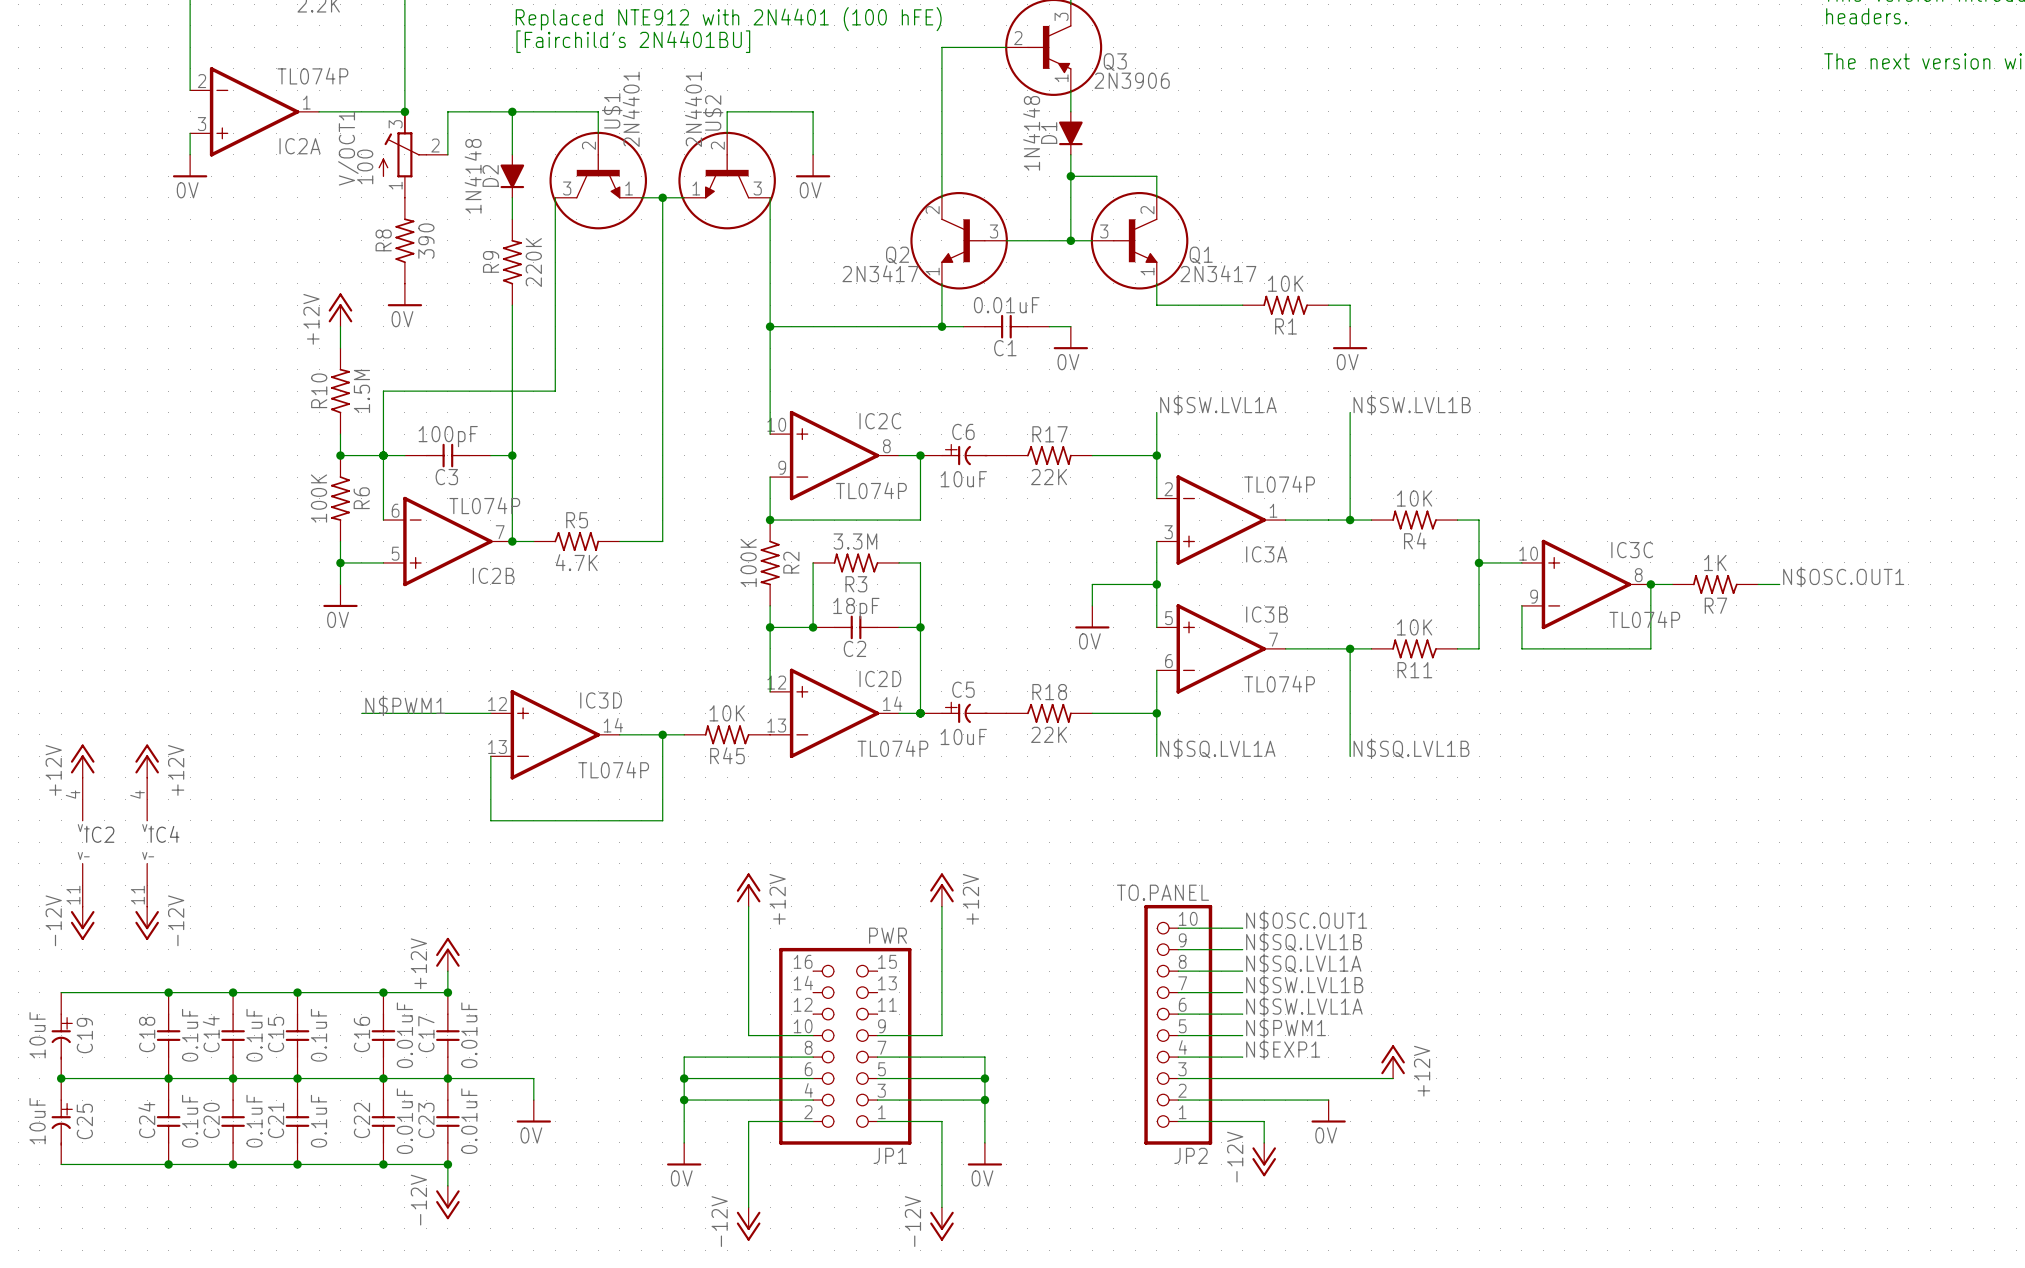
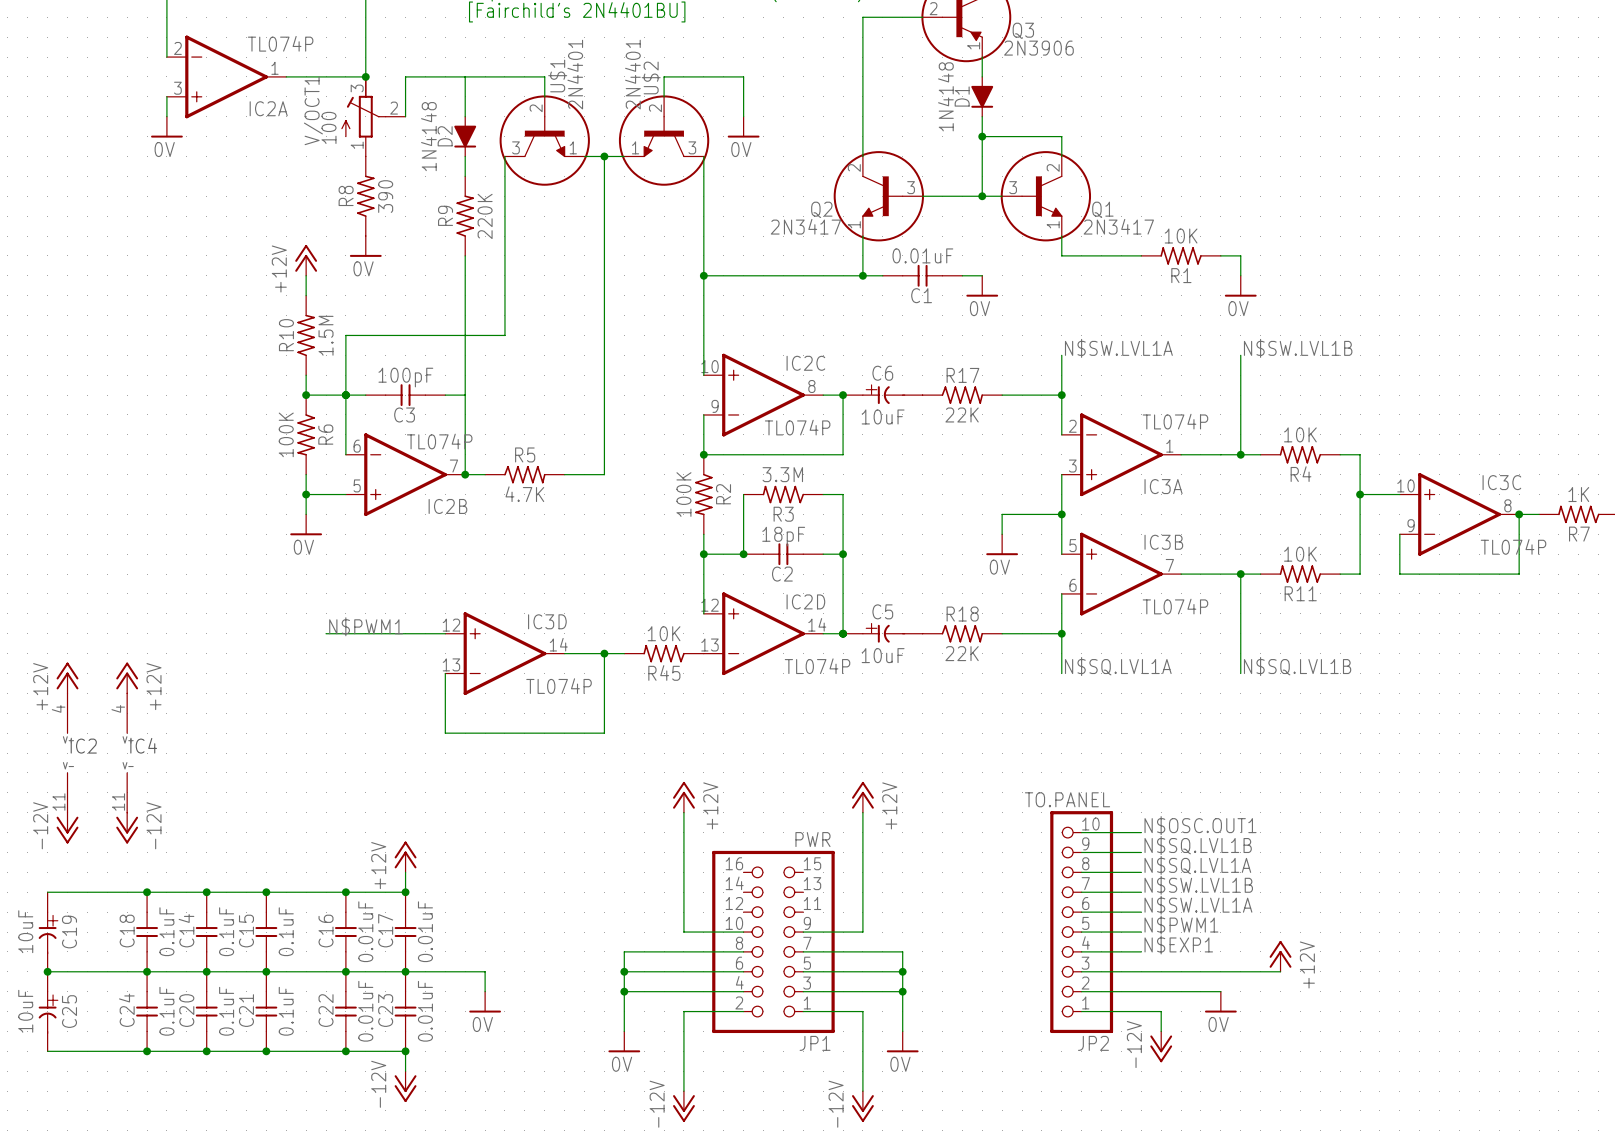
junction: (512, 111) -> none
junction: (512, 455) -> none

